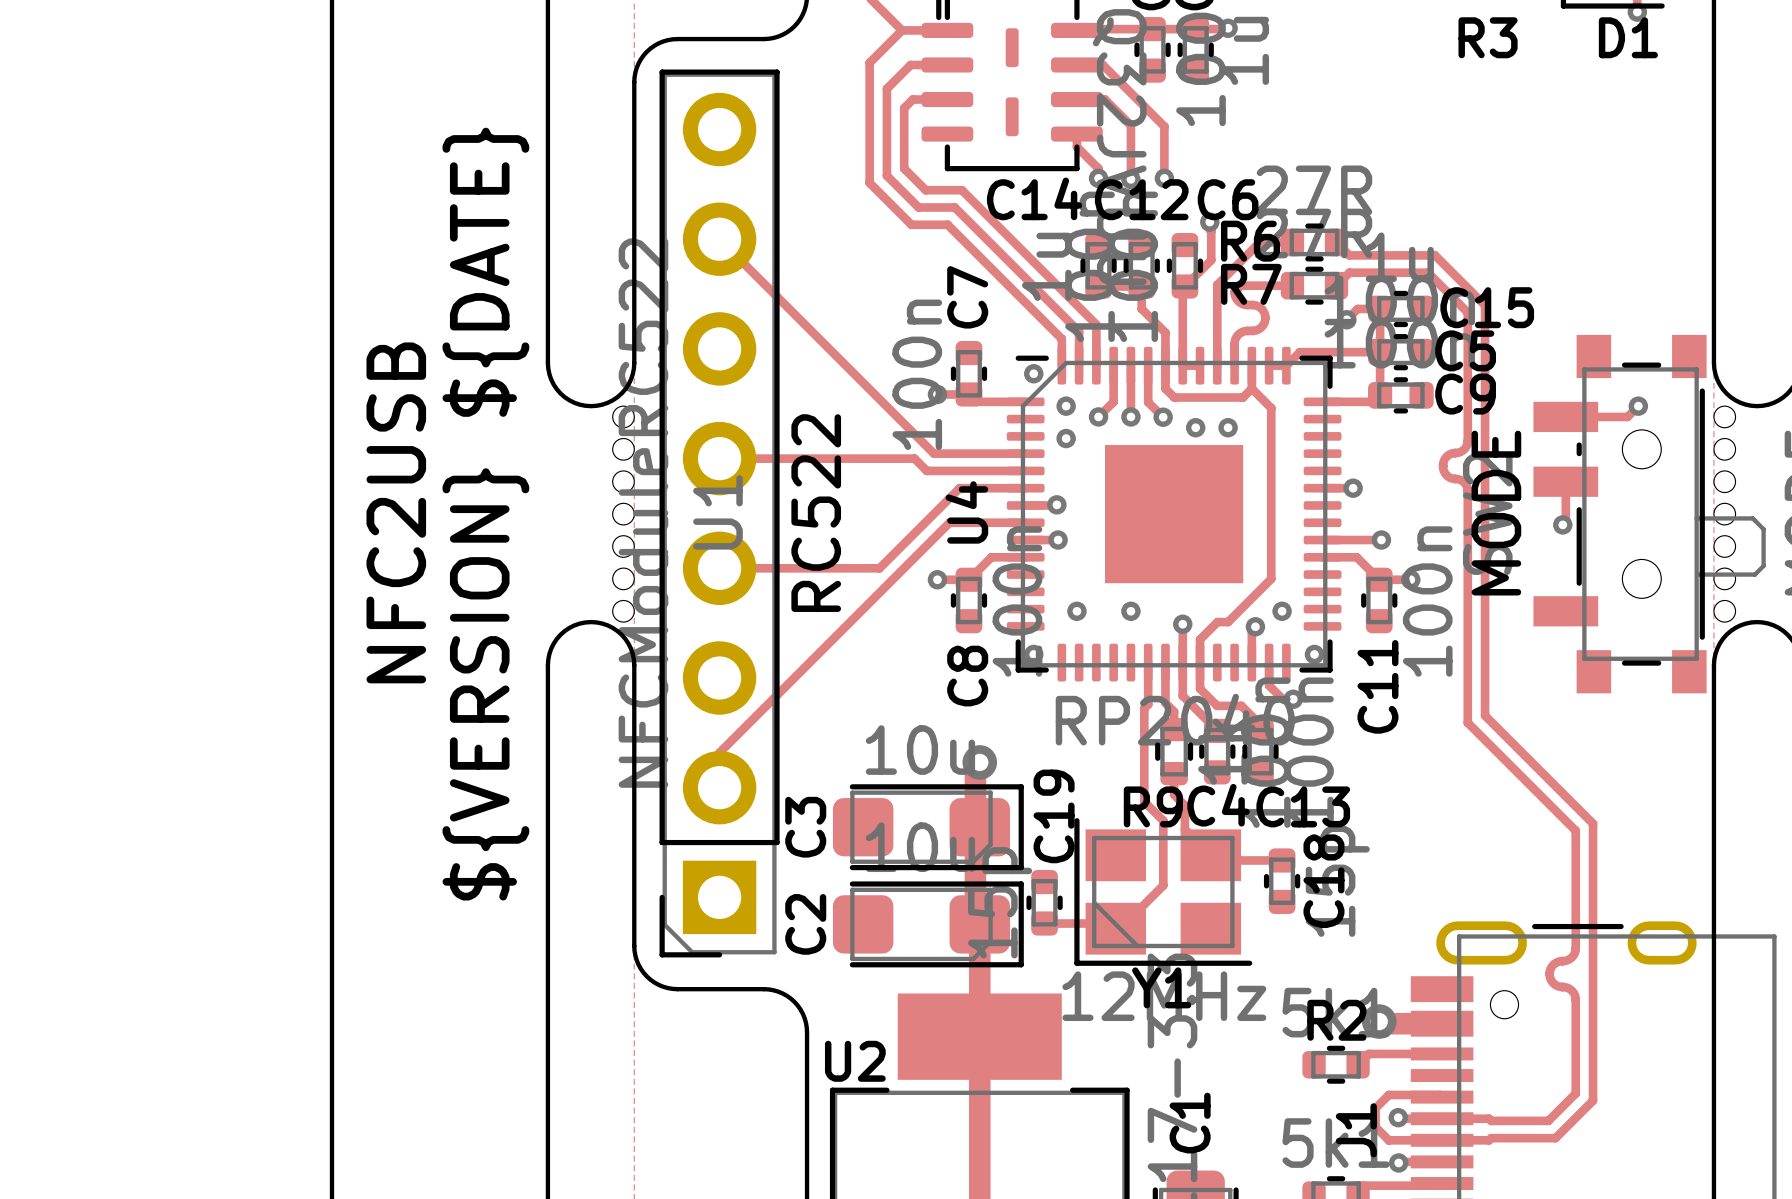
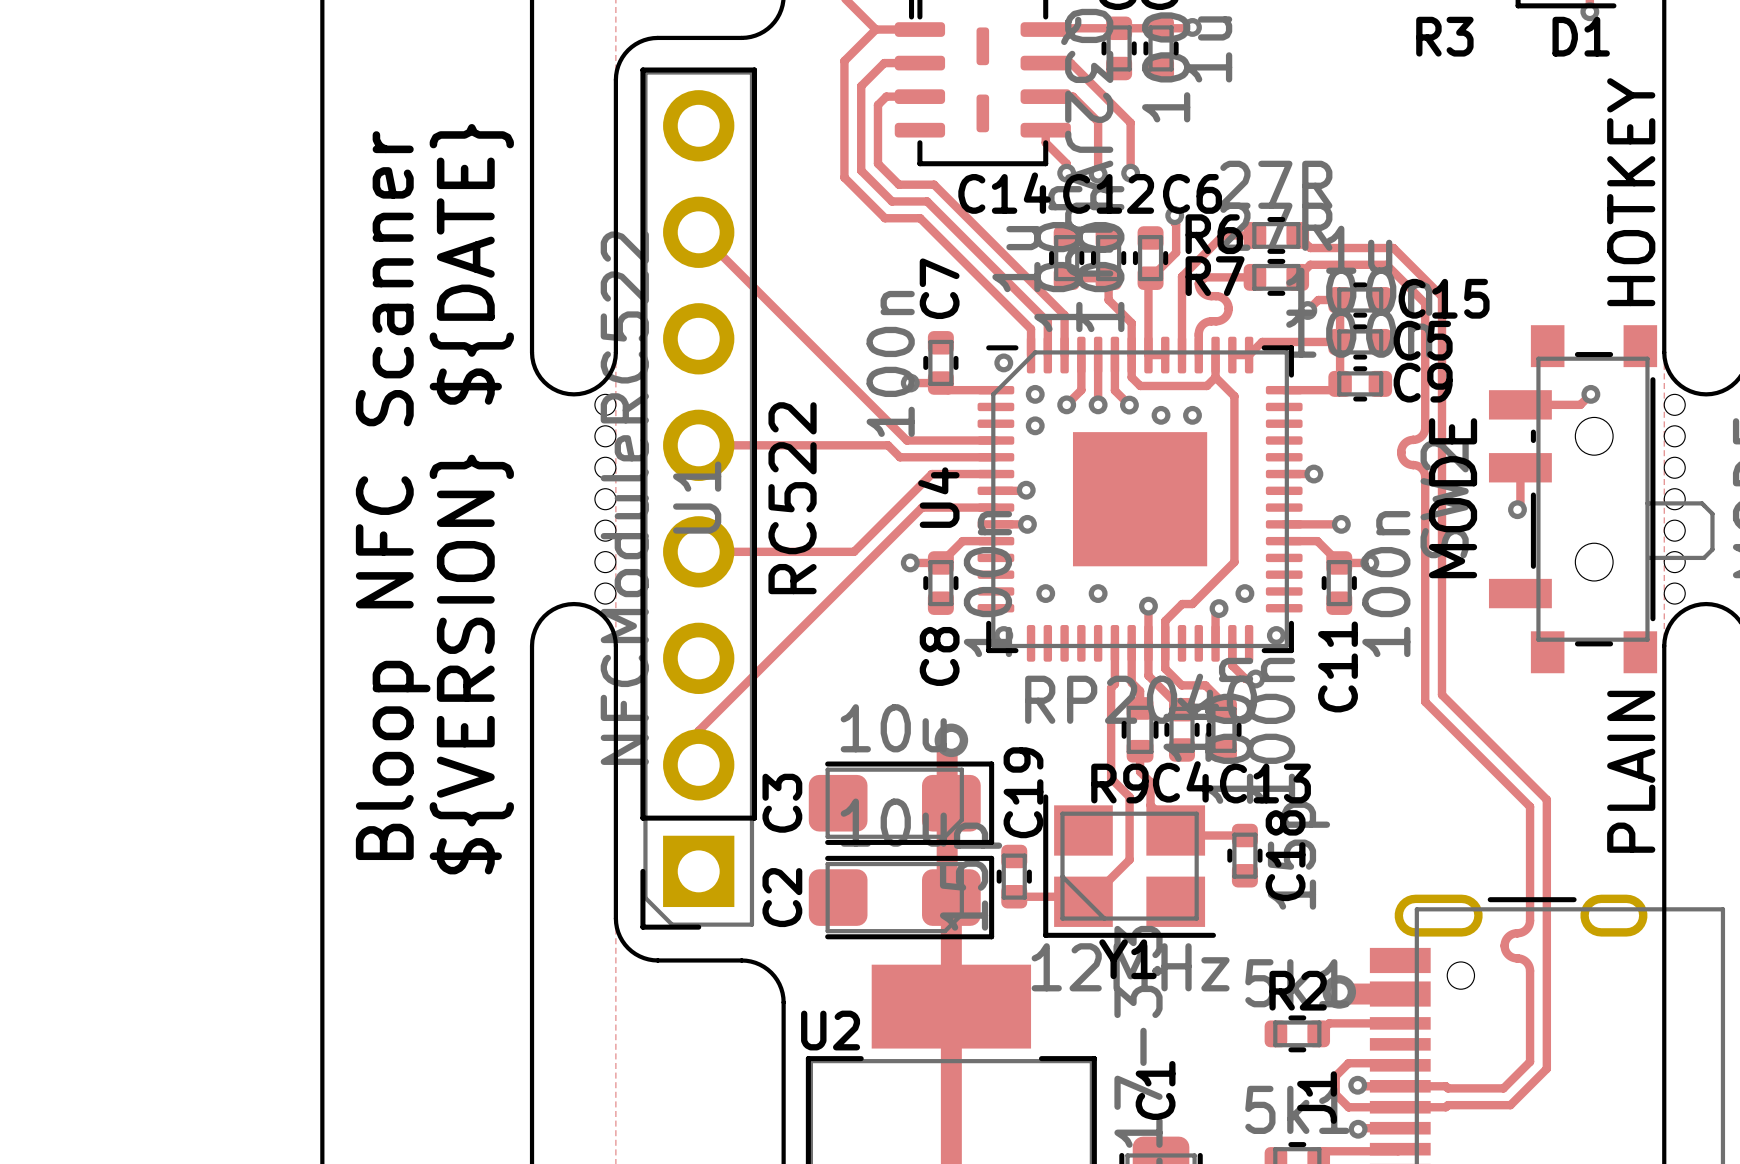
text: none -> HOTKEY (1631, 192)
text: NFC2USB (396, 512) -> Bloop NFC Scanner (393, 495)
text: none -> PLAIN (1631, 771)

